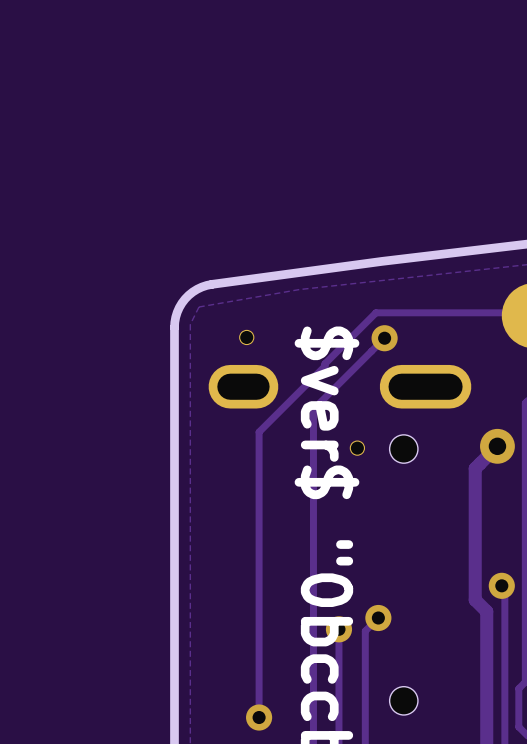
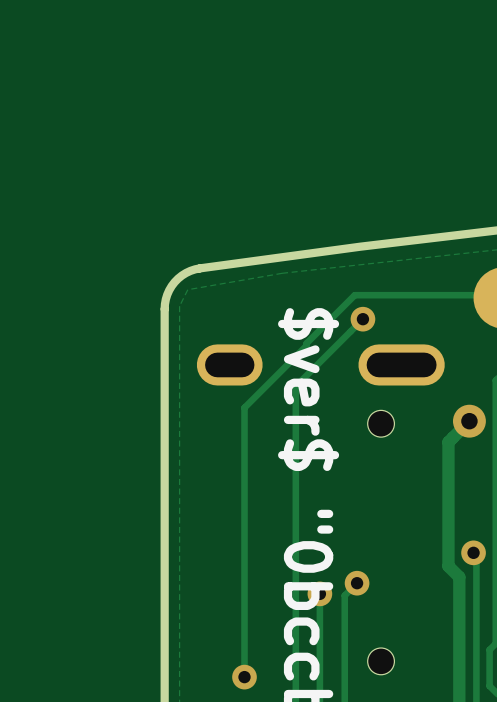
part: (246, 337) -> none
part: (357, 448) -> none

